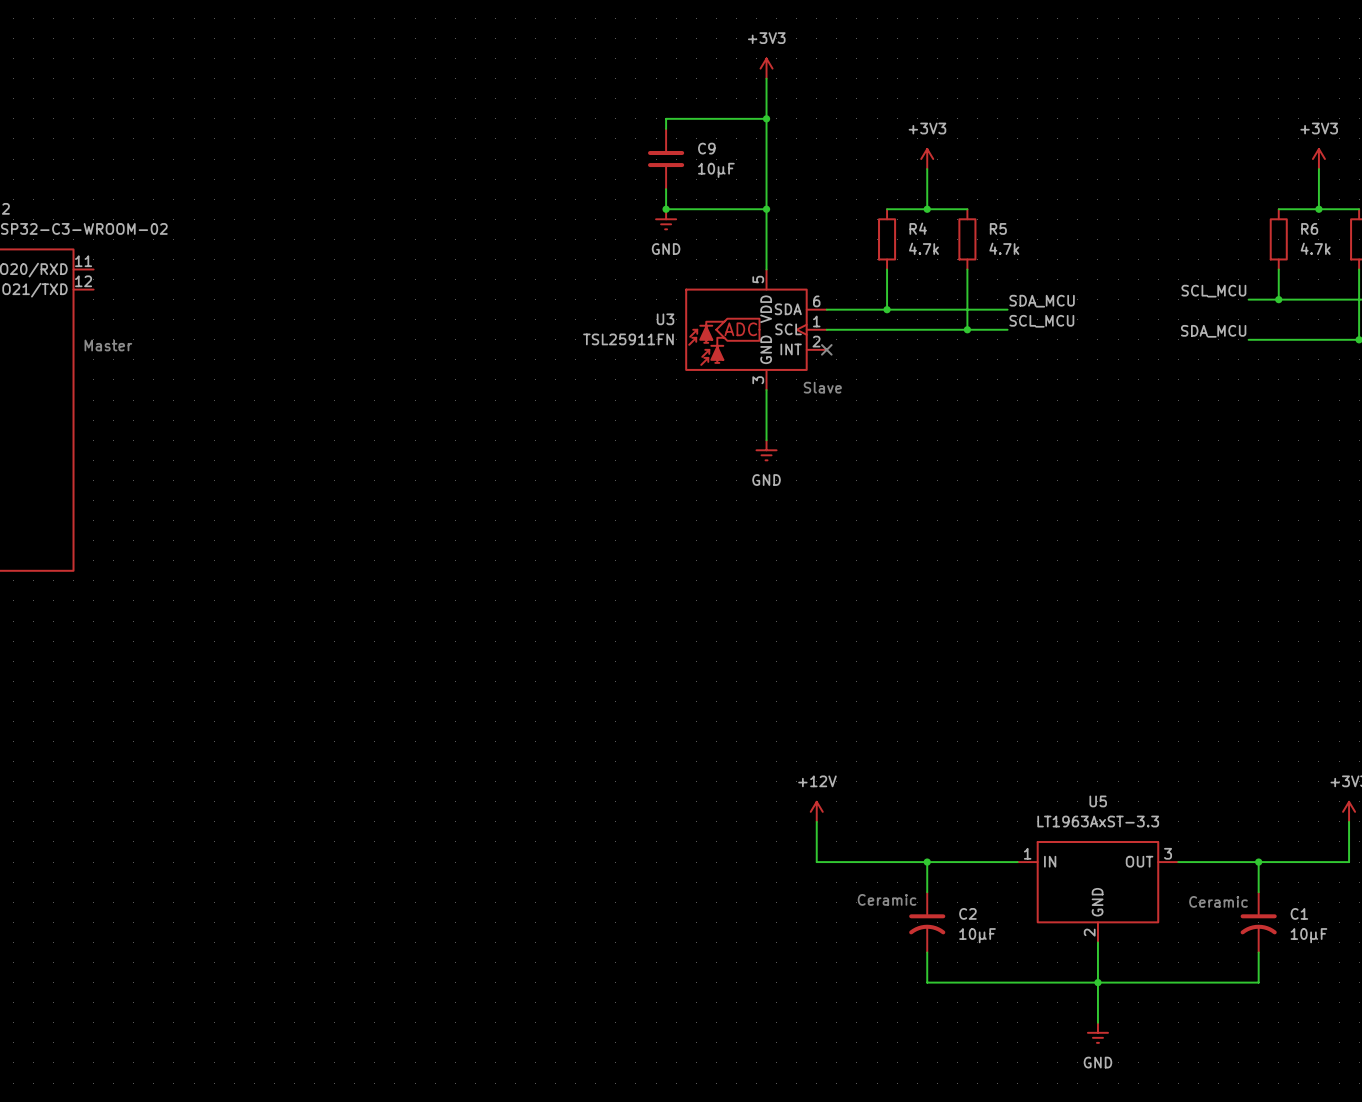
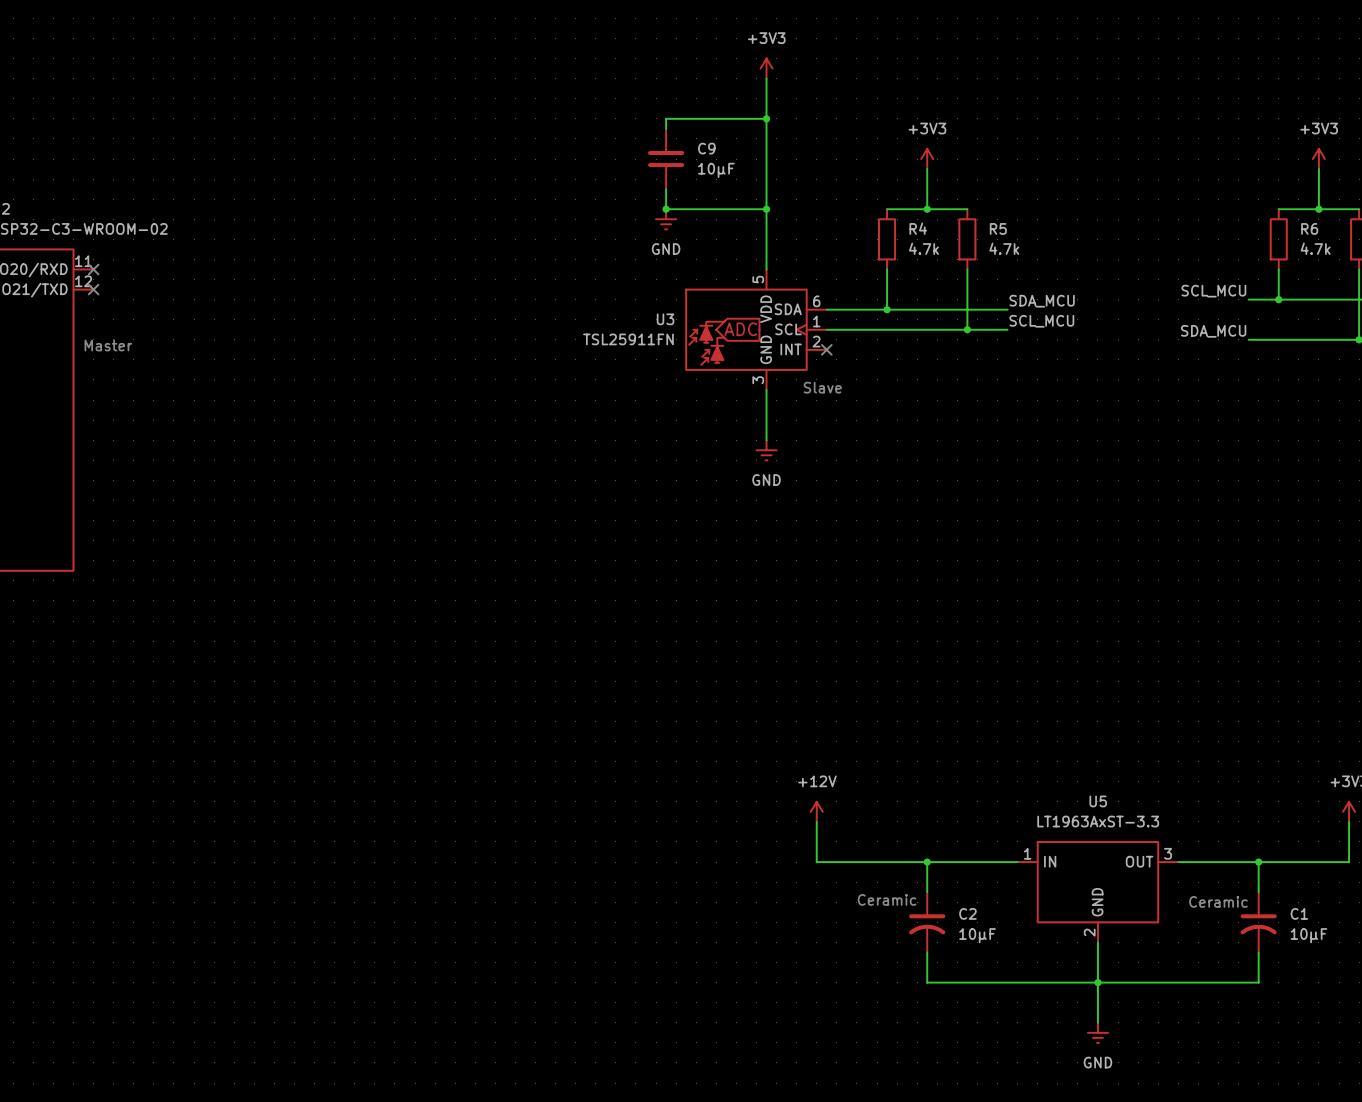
no-connect mark: none -> (93, 269)
no-connect mark: none -> (93, 289)

